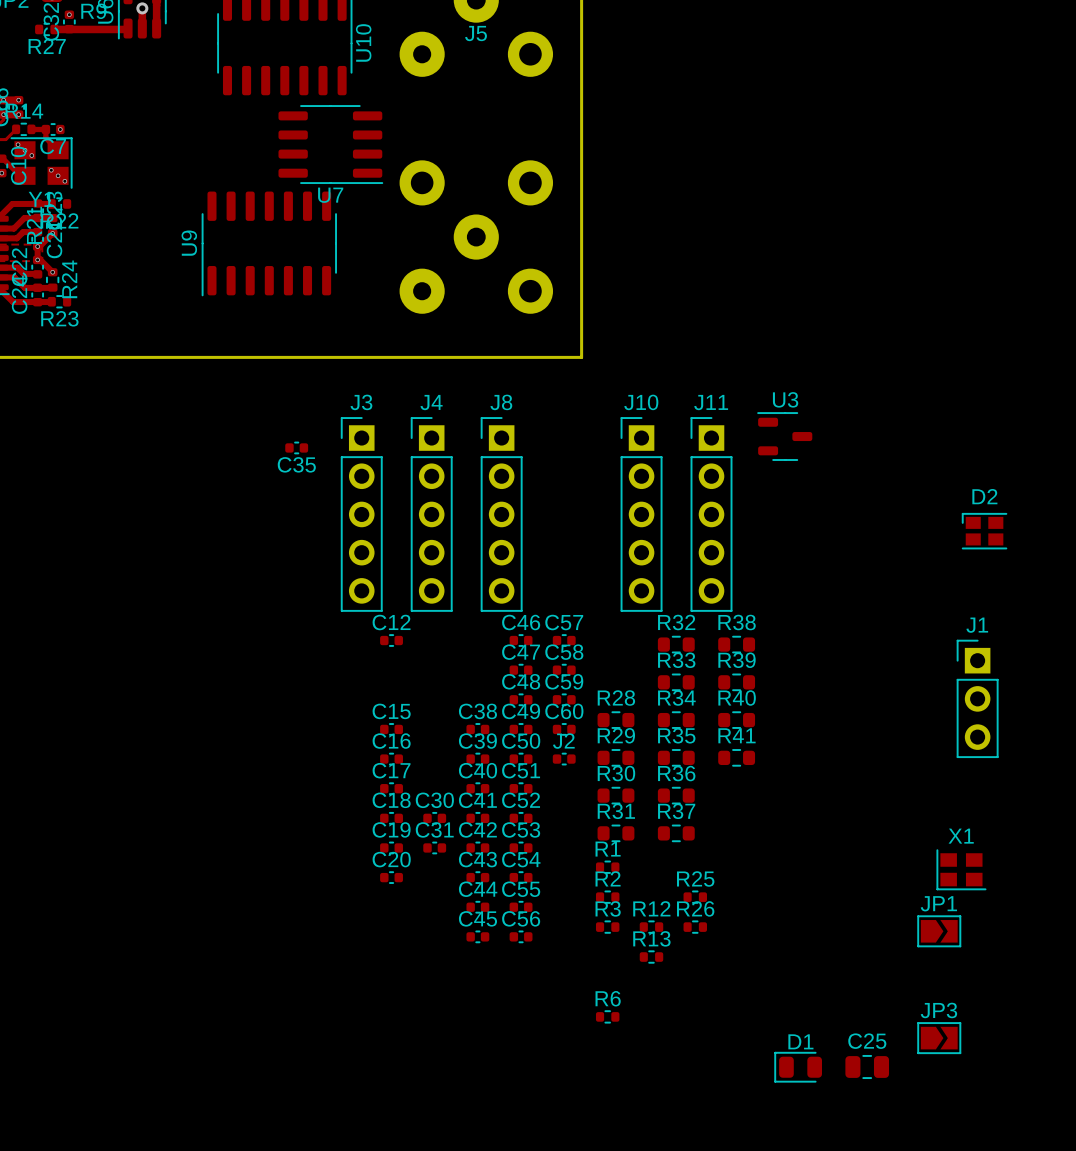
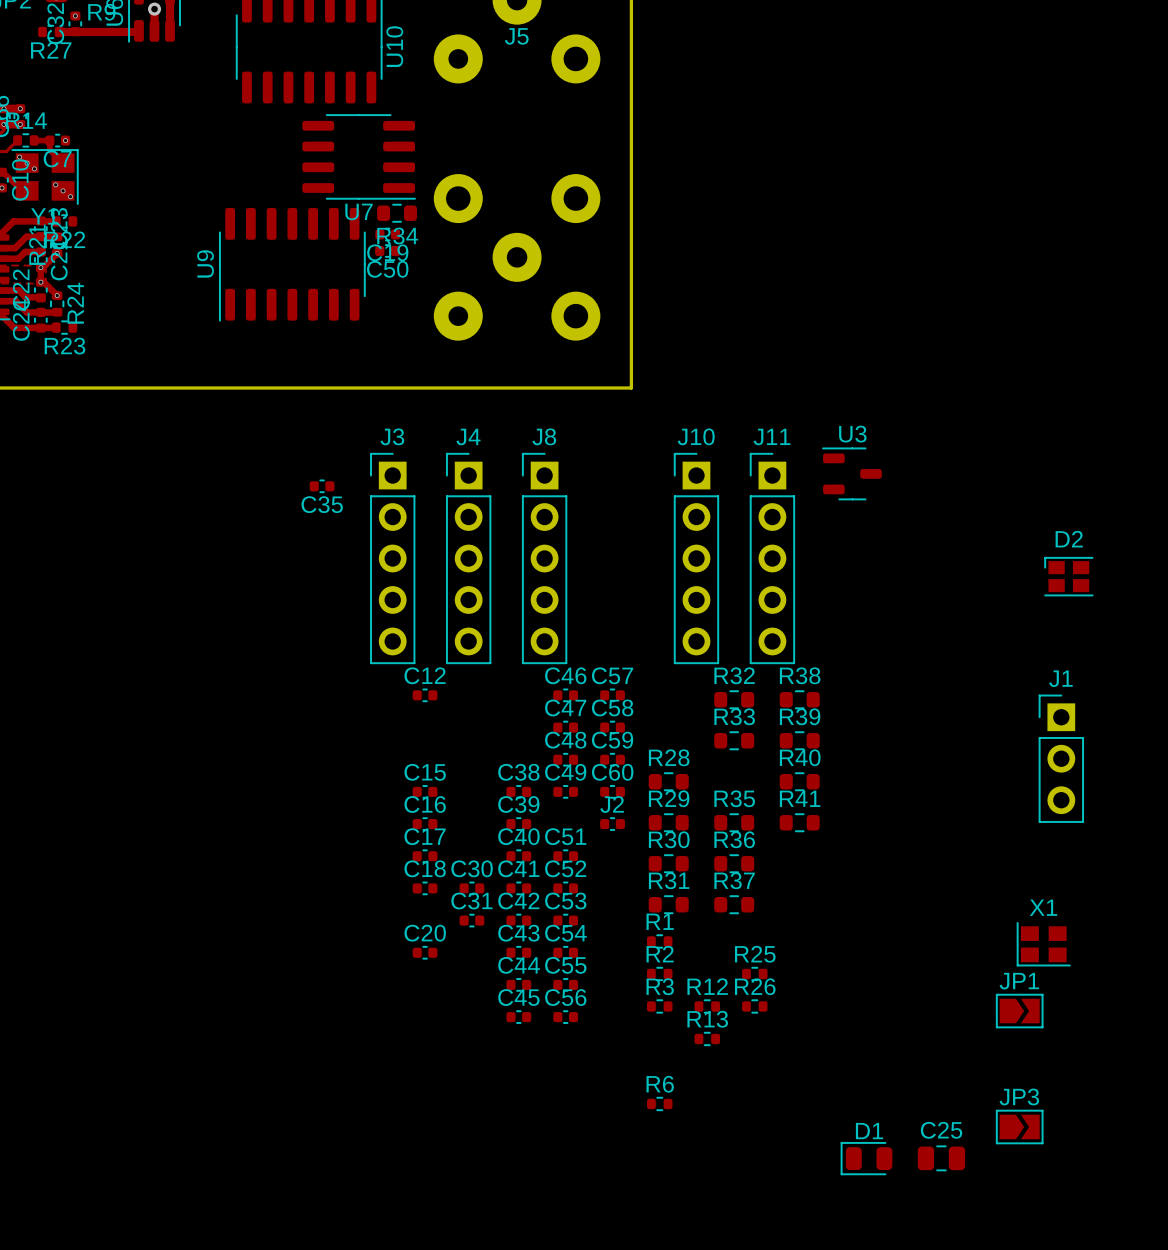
R34 name position: R34 (676, 698) -> R34 (397, 236)
R34 position: (676, 720) -> (397, 213)
C50 name position: C50 (521, 741) -> C50 (387, 269)
C50 position: (521, 759) -> (387, 250)
C19 name position: C19 (391, 829) -> C19 (387, 252)
C19 position: (391, 847) -> (387, 234)

